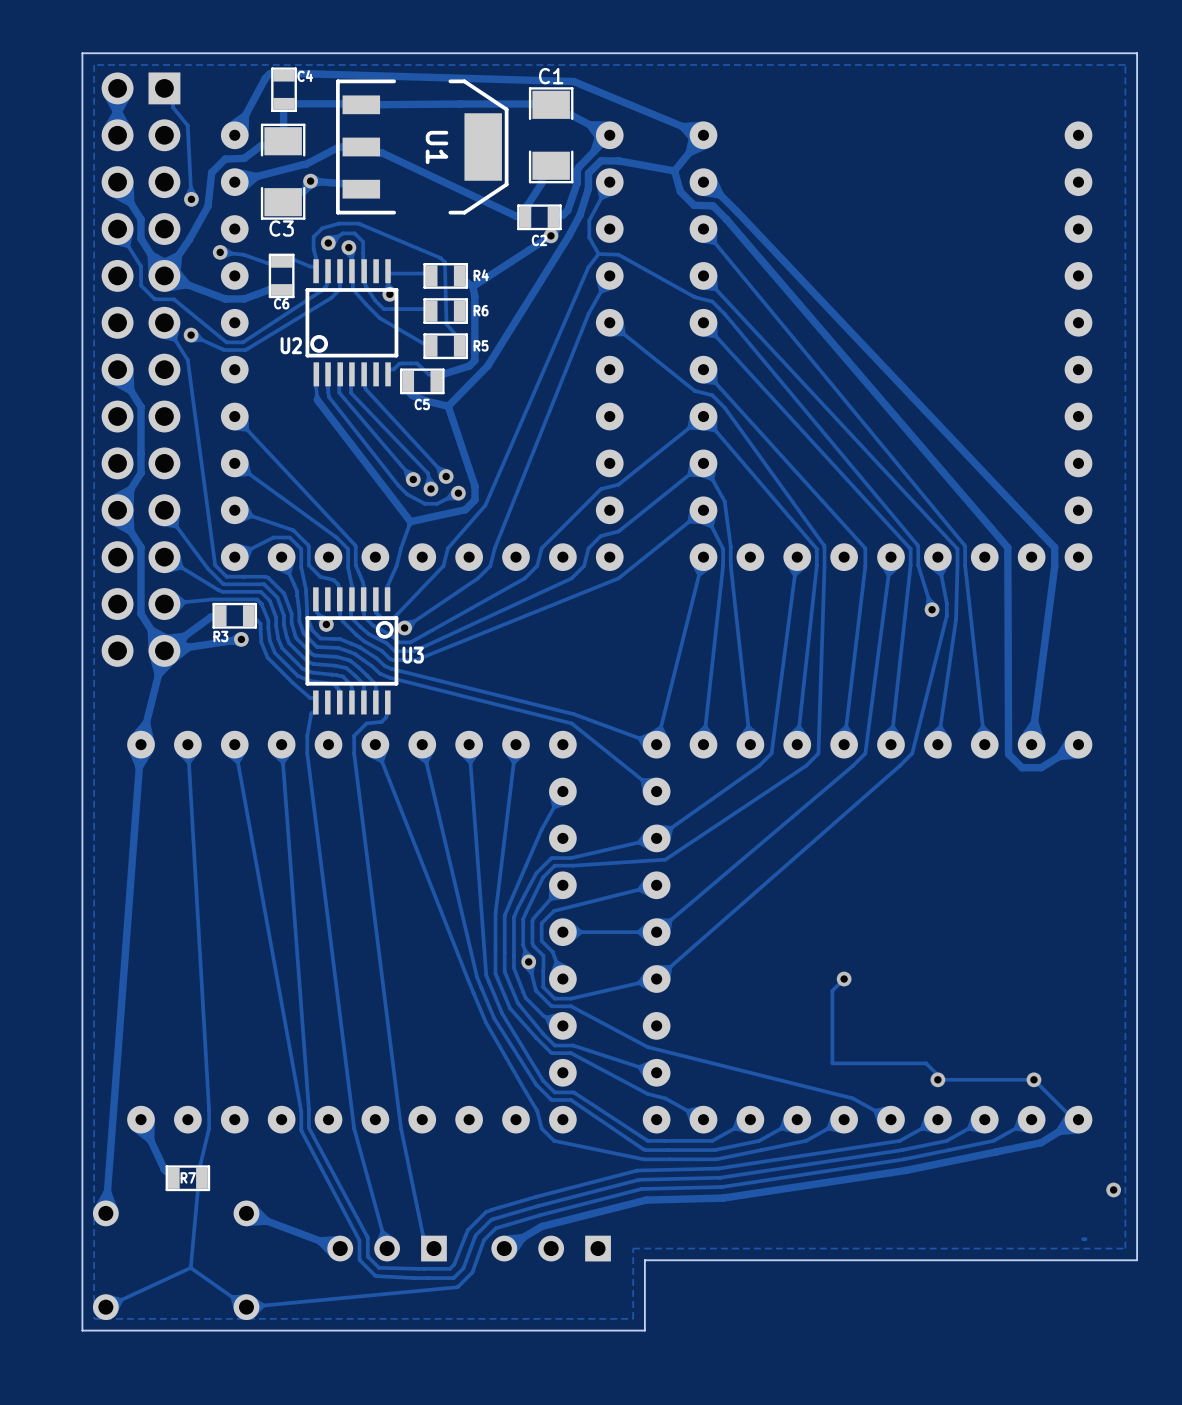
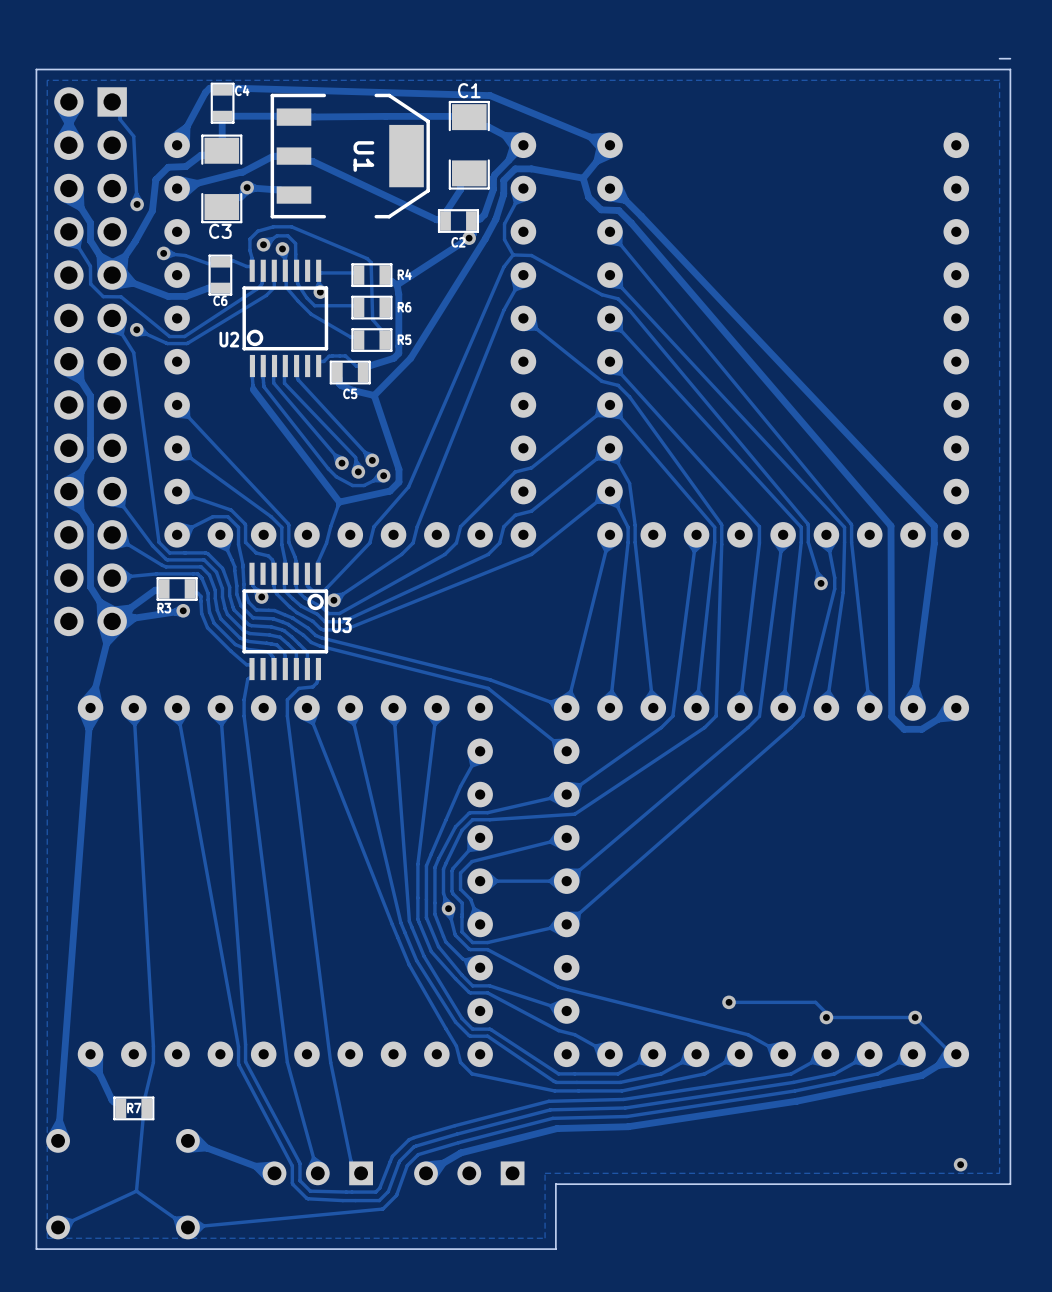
board edge: none -> (1010, 58) (999, 58)
track: (844, 979) (832, 990) (832, 1063) -> none
via position: (844, 979) -> (729, 1002)
via position: (1113, 1189) -> (960, 1164)

